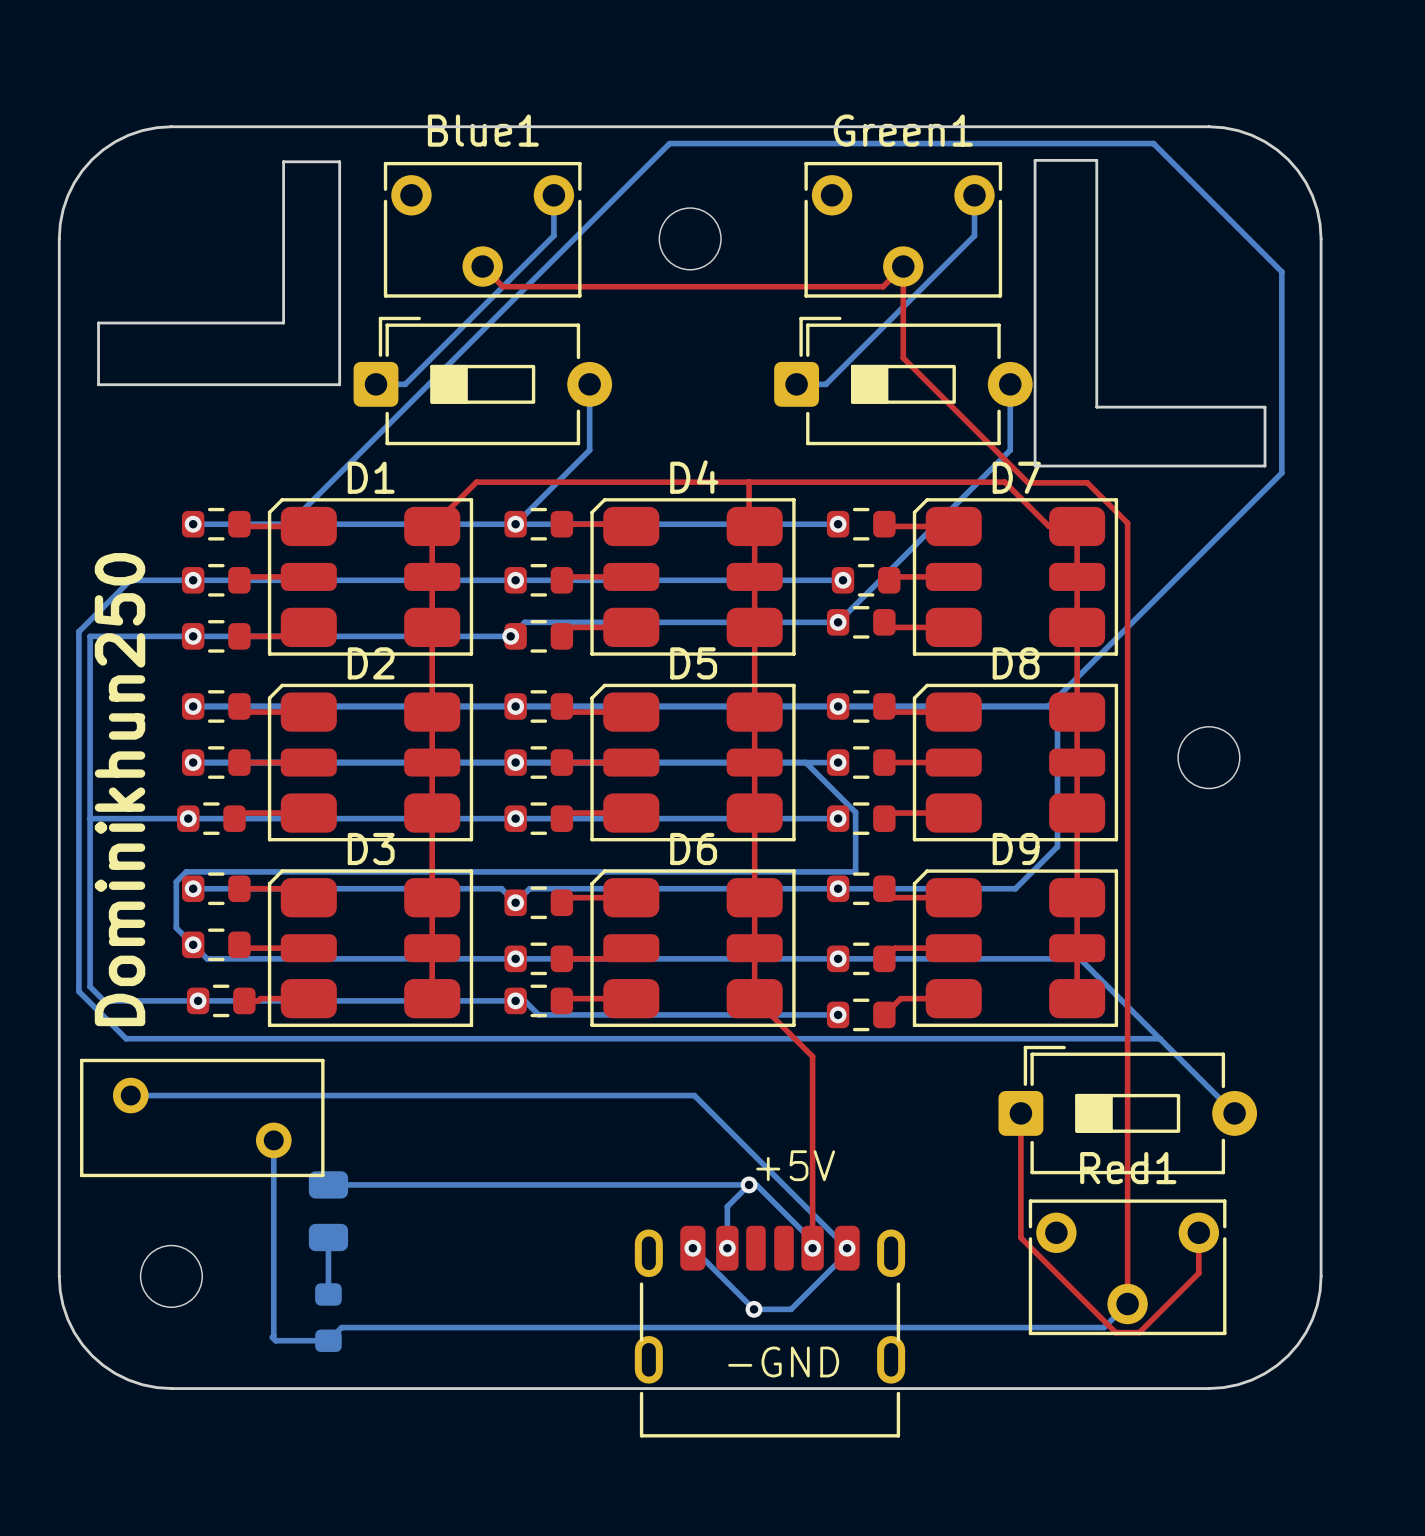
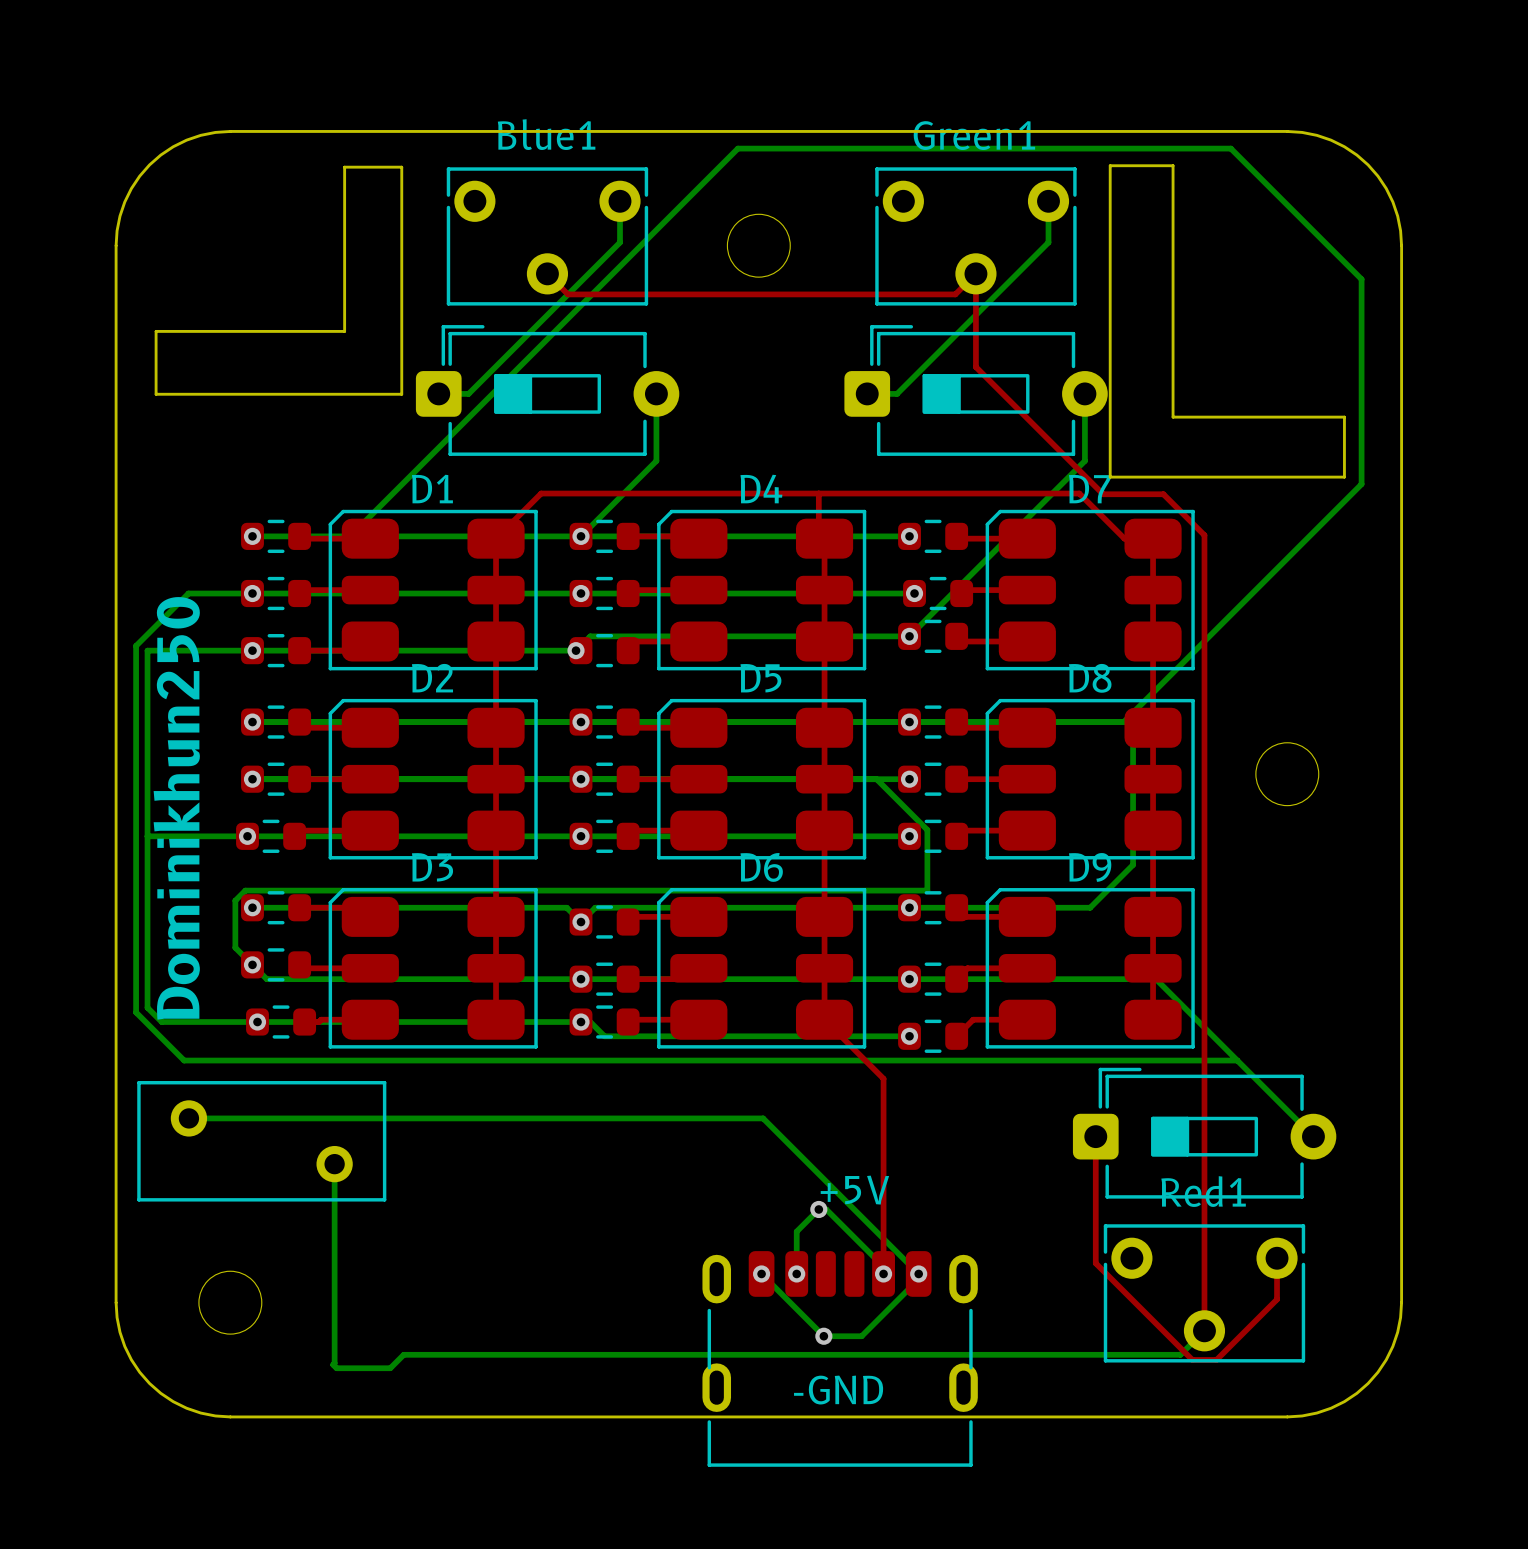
bottom track: (328, 1184) (749, 1184) -> none
part: (328, 1211) -> none
bottom track: (328, 1237) (328, 1294) -> none
part: (328, 1317) -> none

